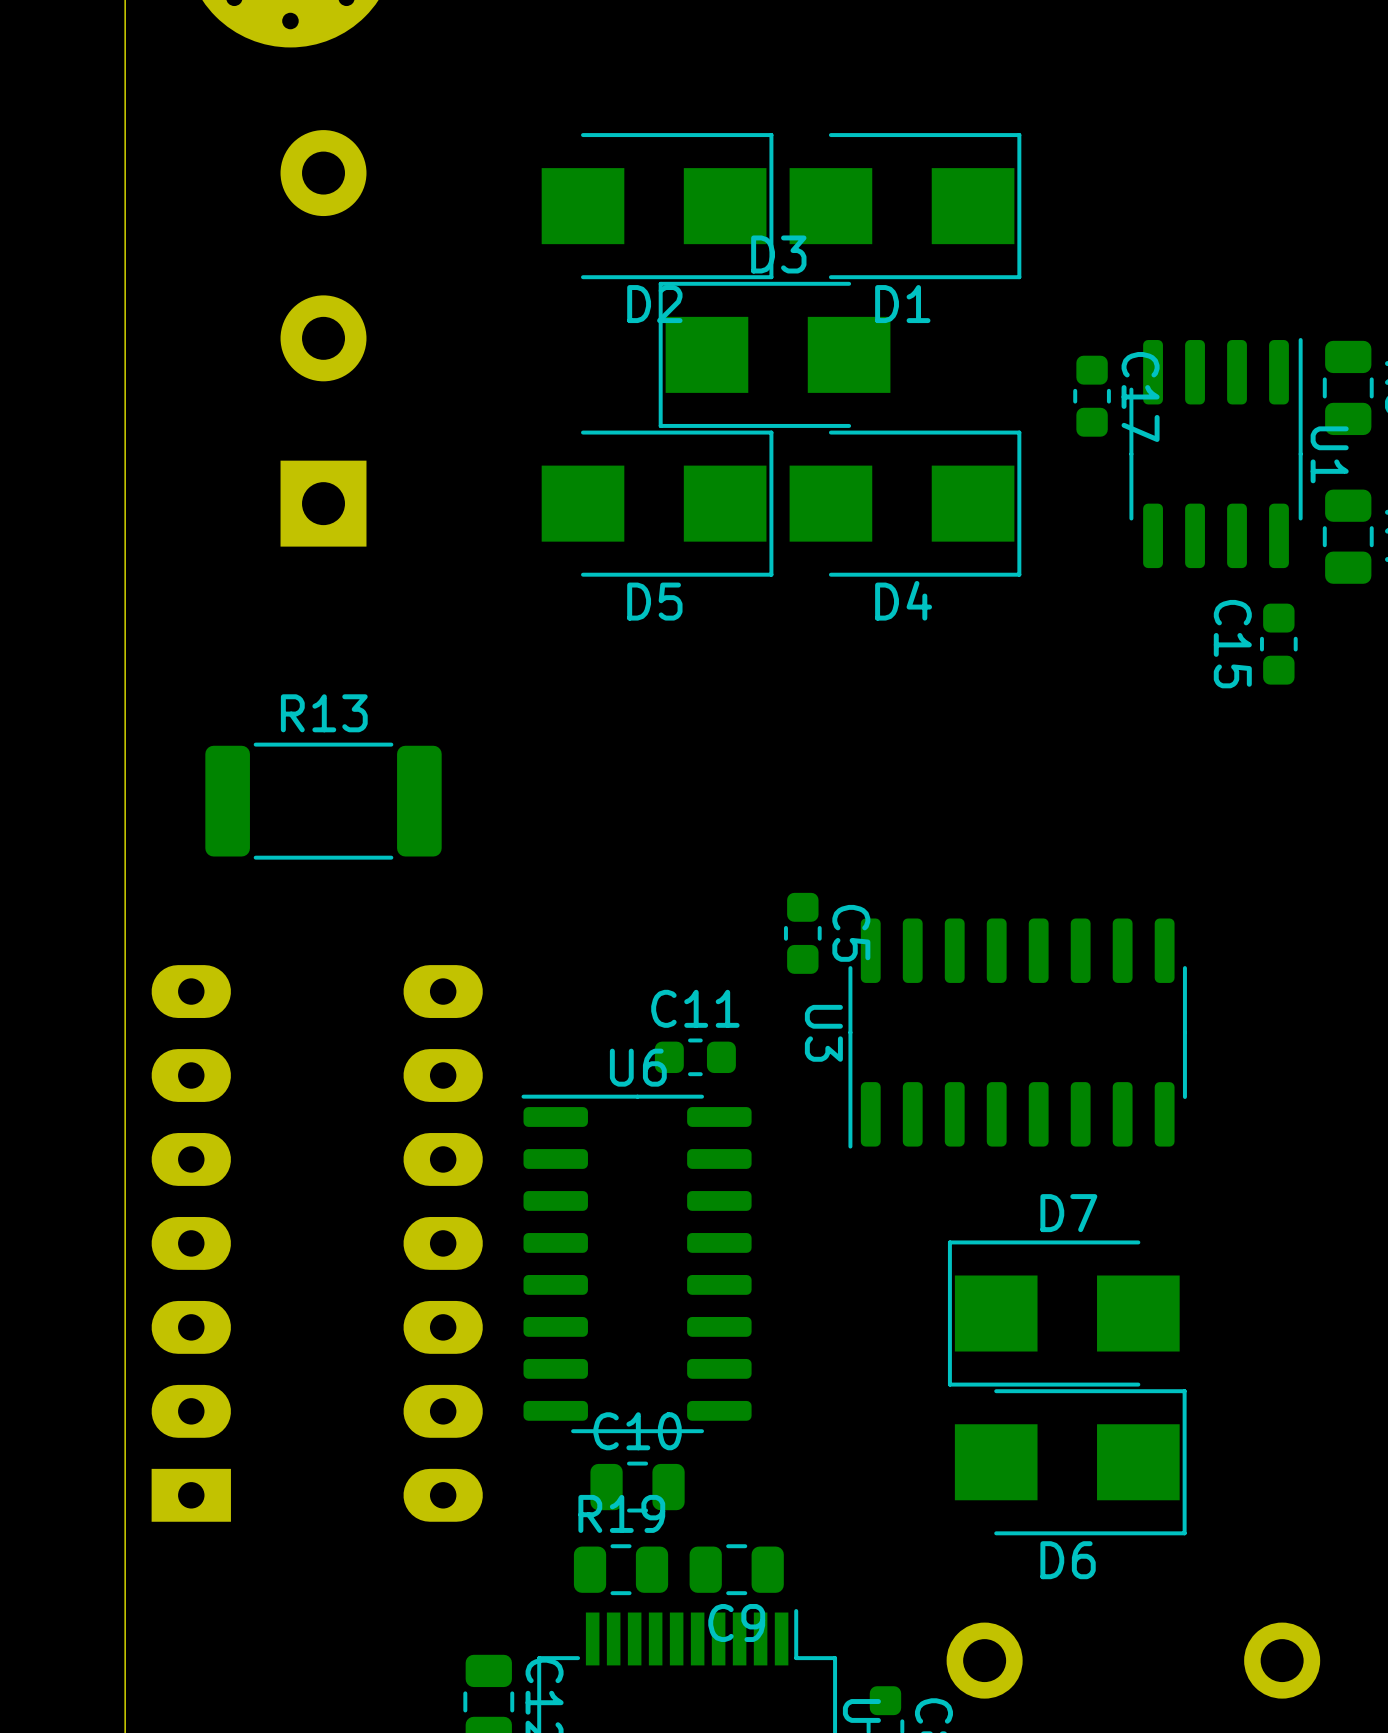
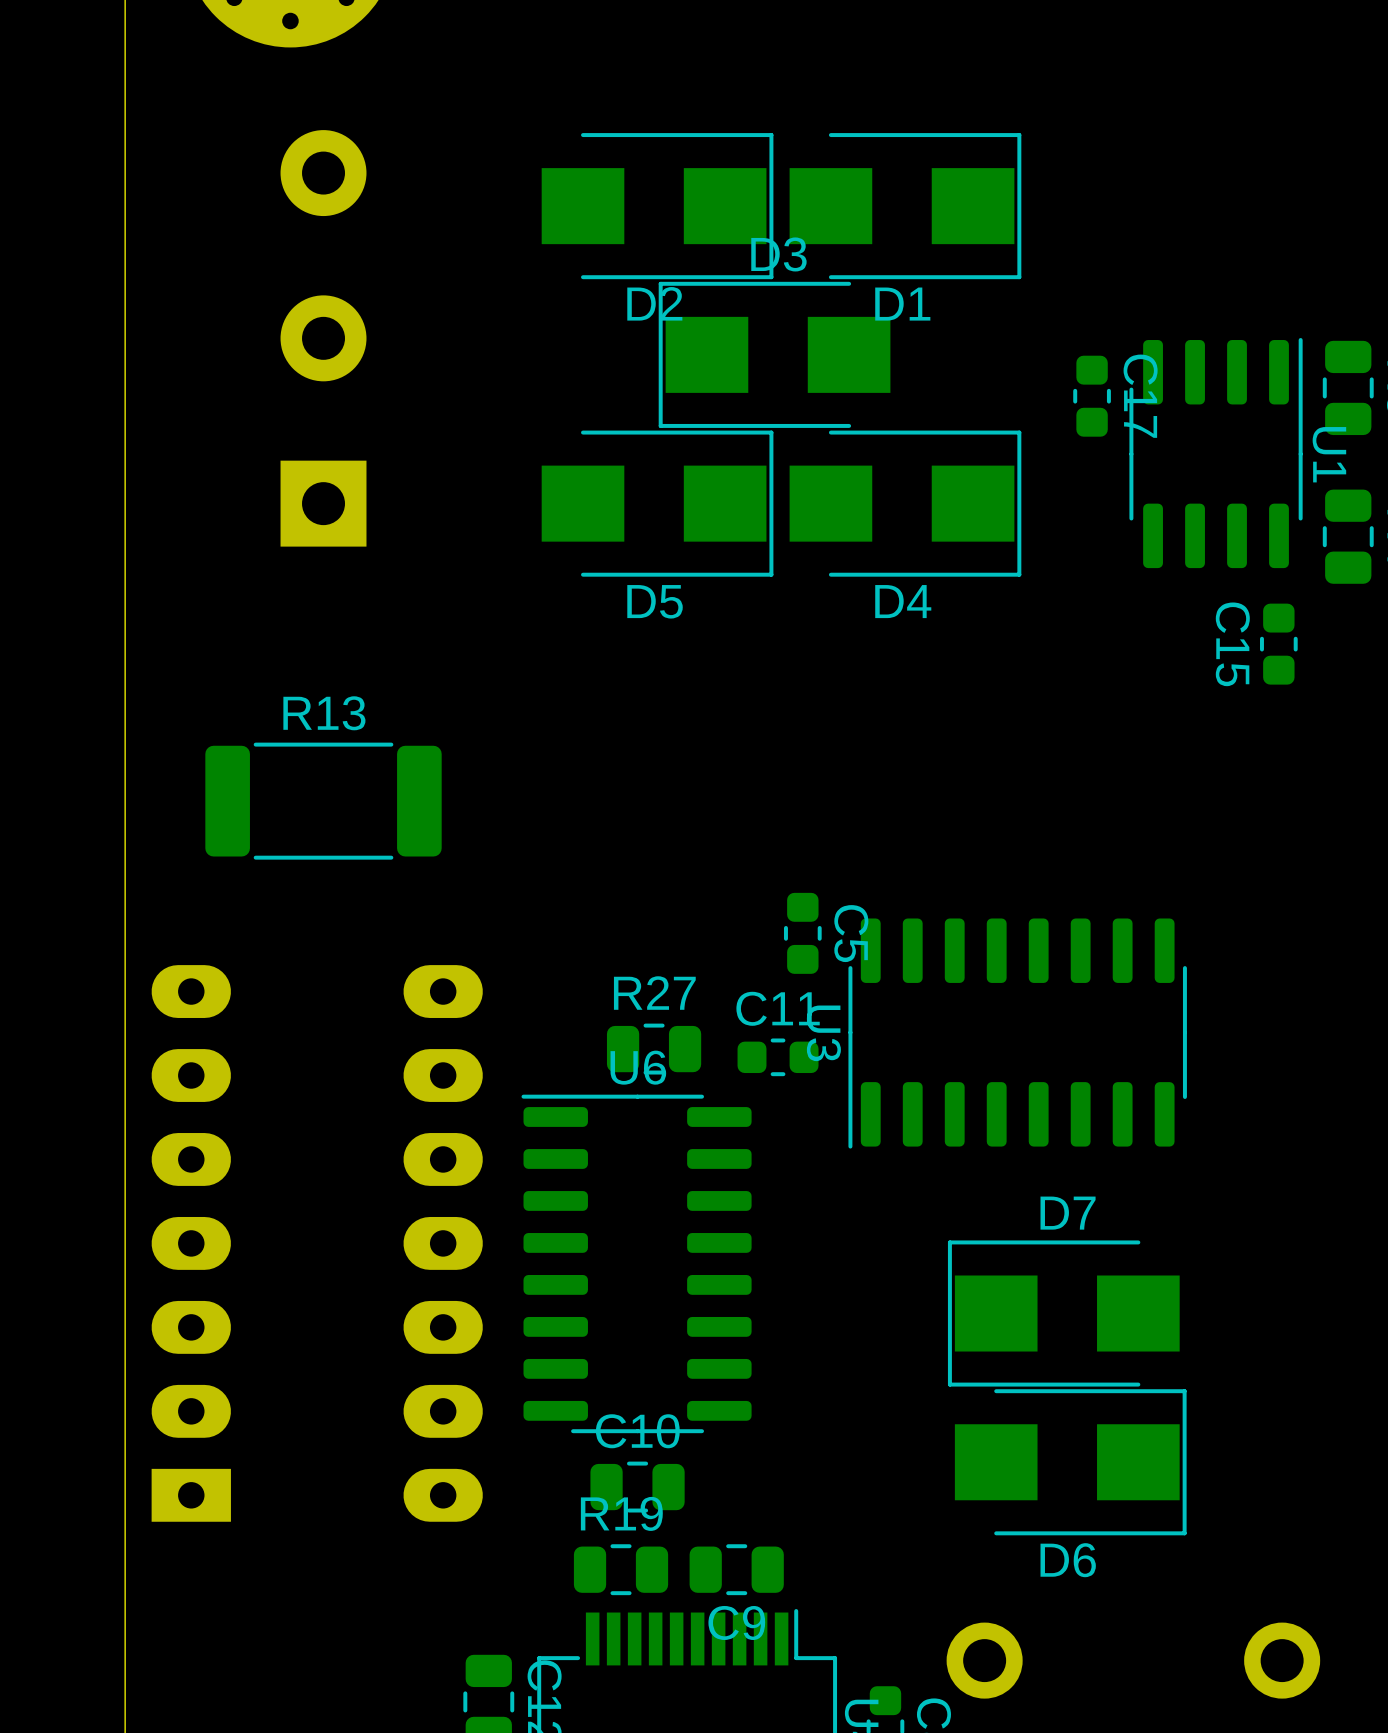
R27: none -> (654, 1049)
C11 position: (695, 1057) -> (778, 1057)

